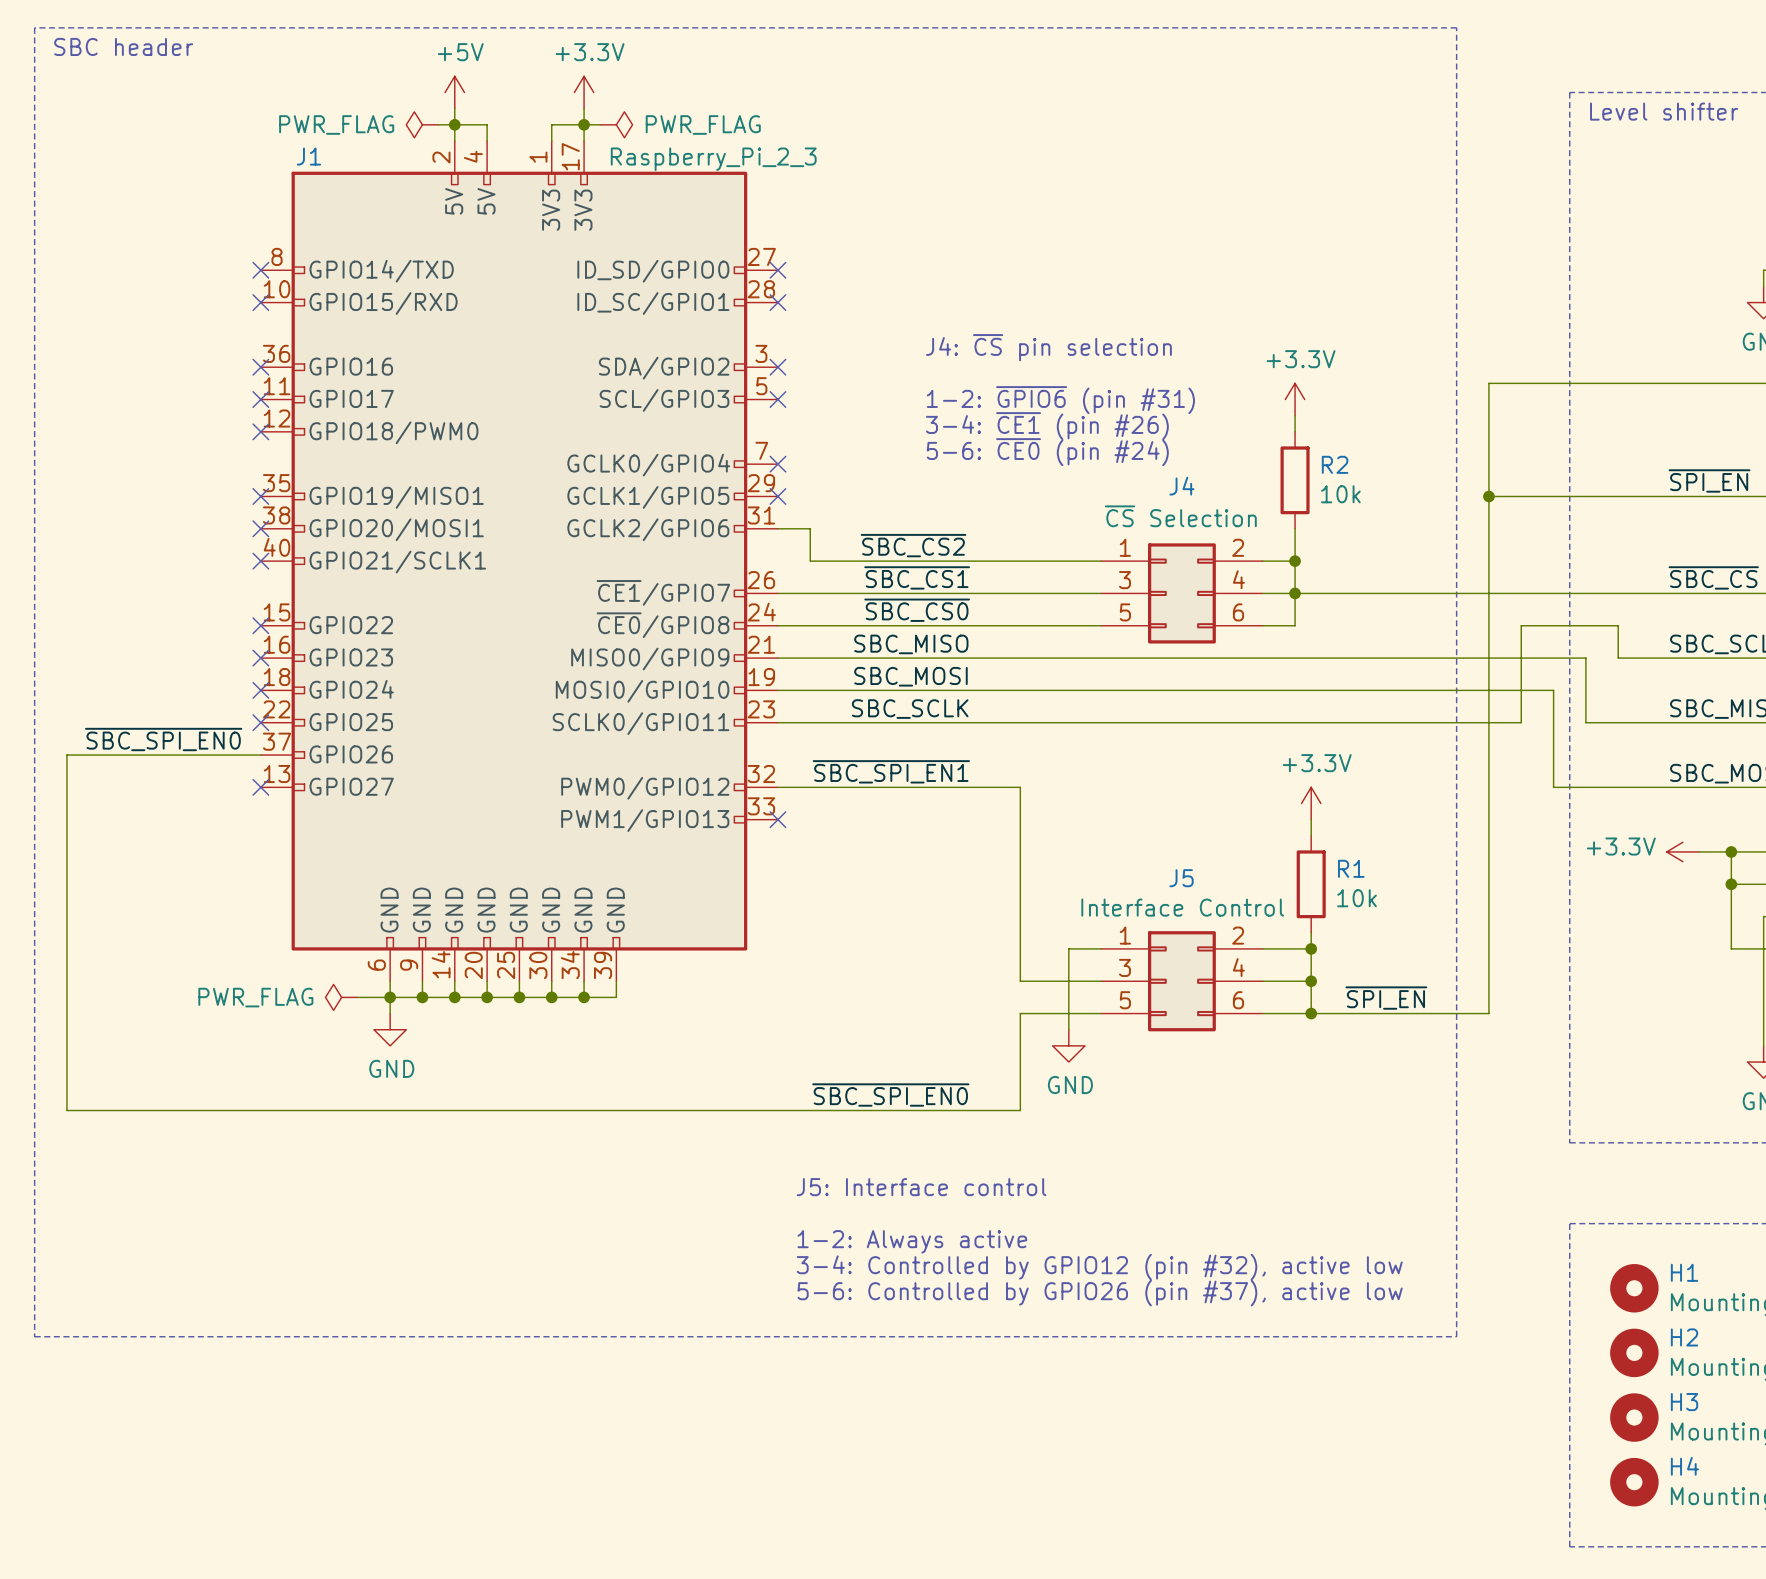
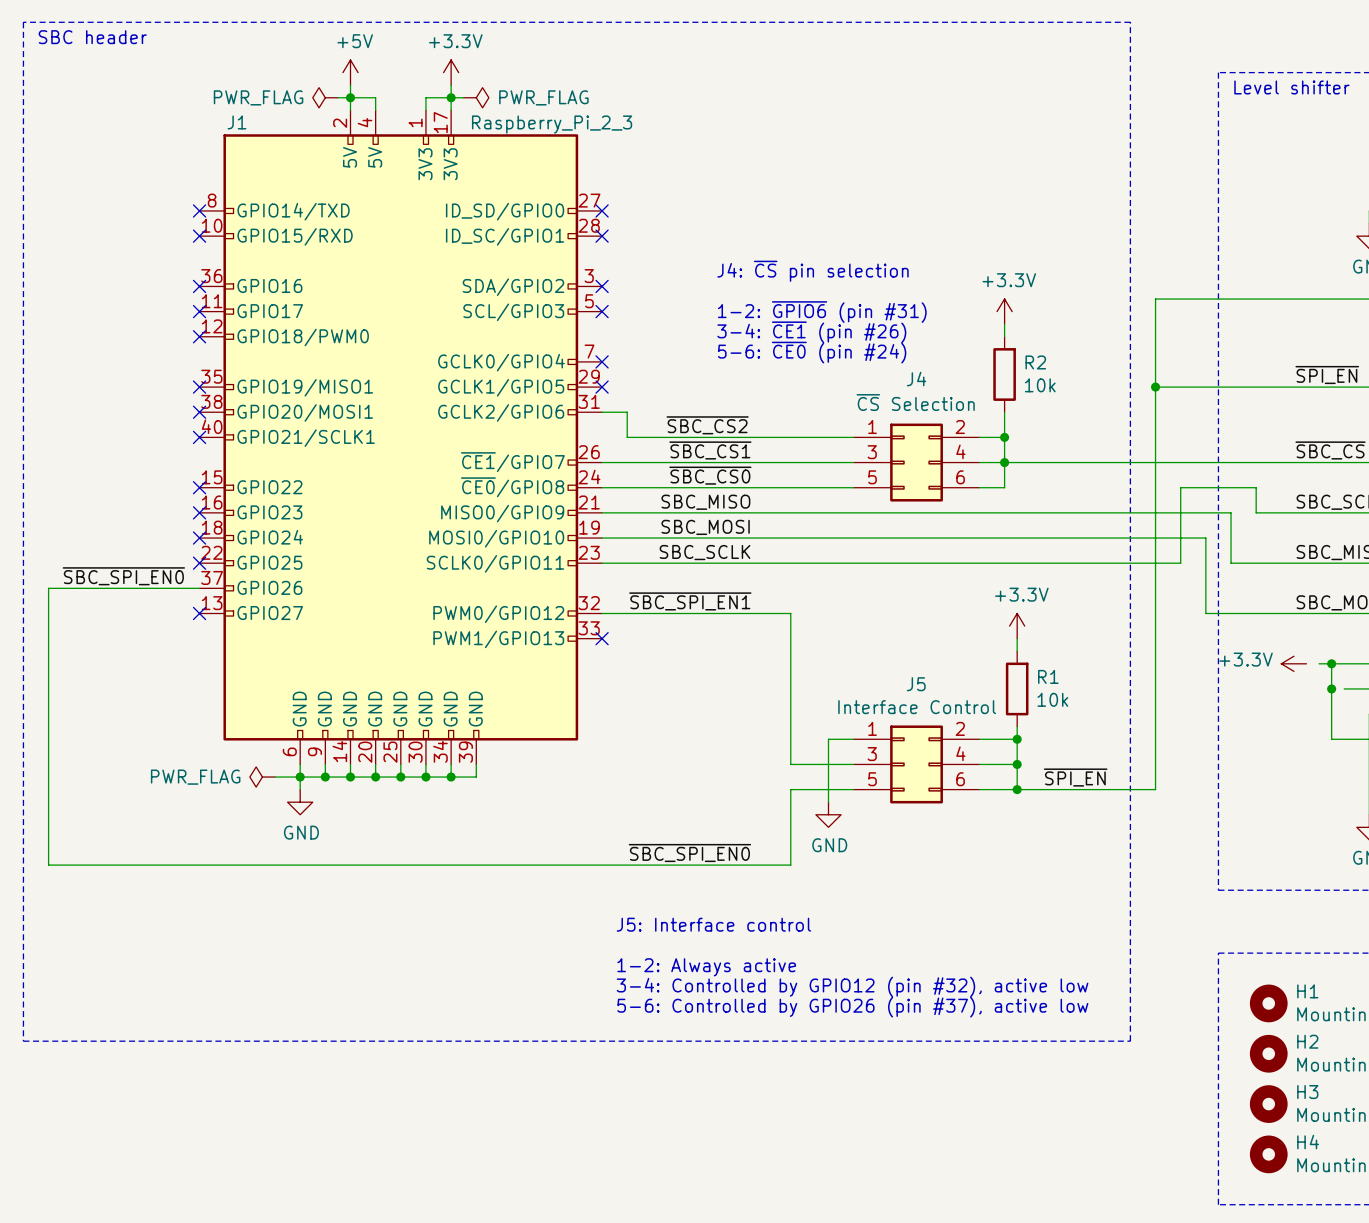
power symbol position: +3.3V (1682, 851) -> +3.3V (1293, 663)
wire: (1731, 851) (1731, 948) -> (1331, 663) (1331, 739) (1344, 739)
junction position: (1731, 851) -> (1331, 663)
junction position: (1731, 884) -> (1331, 688)

